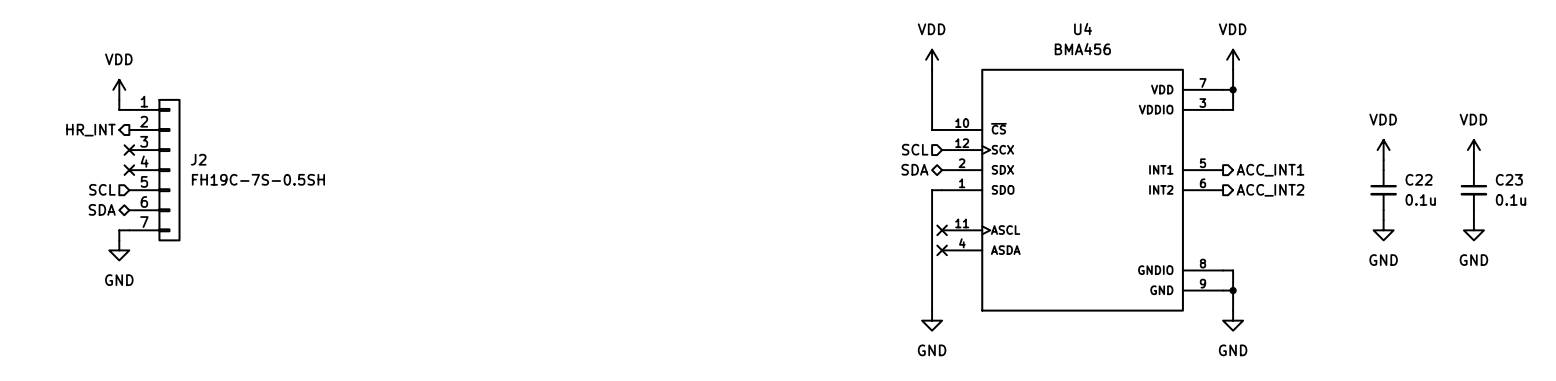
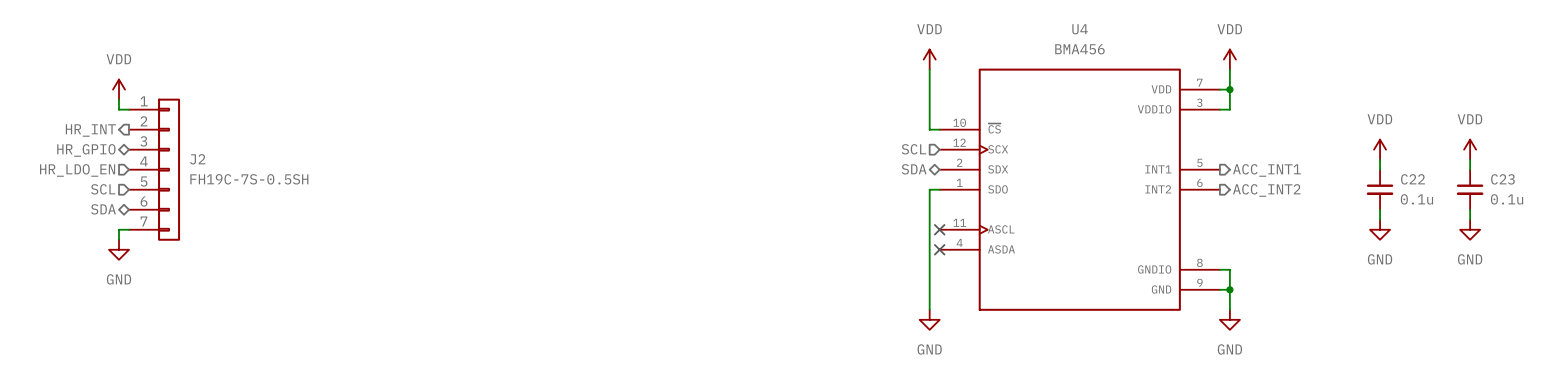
hierarchical label: none -> HR_GPIO (86, 150)
no-connect mark: (129, 150) -> none
hierarchical label: none -> HR_LDO_EN (77, 170)
no-connect mark: (129, 170) -> none

